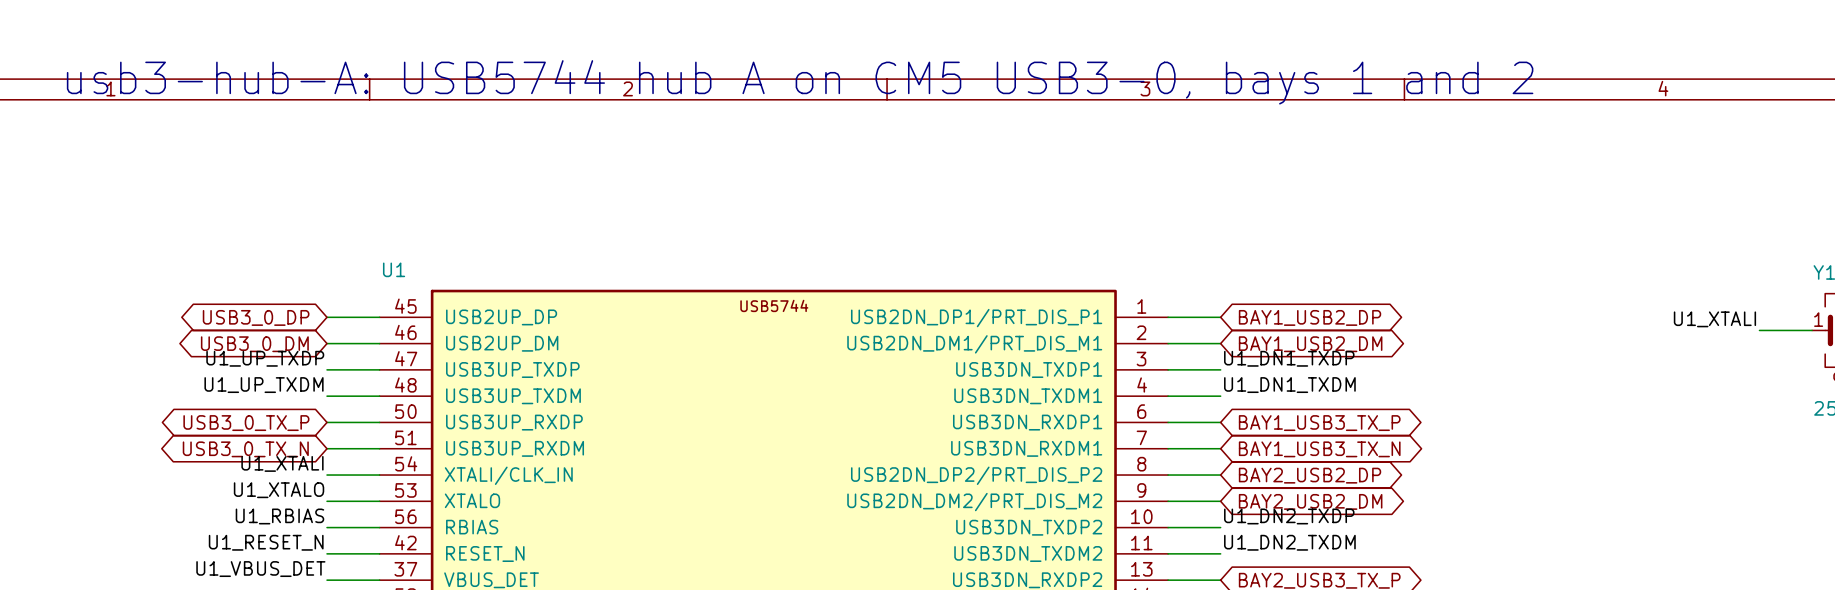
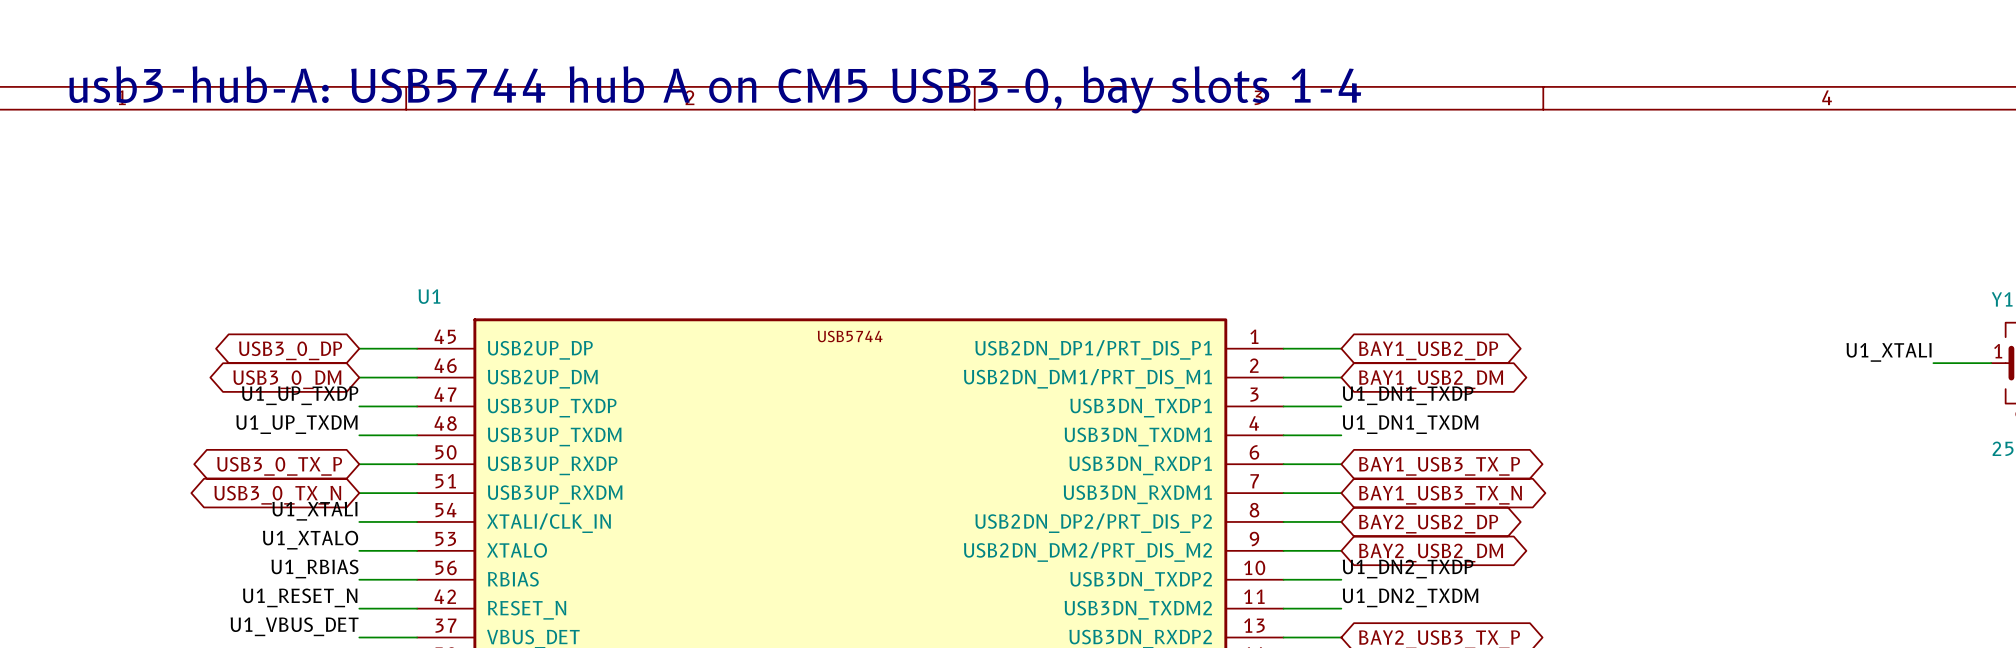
text: usb3-hub-A: USB5744 hub A on CM5 USB3-0, bays 1 and 2 (800, 82) -> usb3-hub-A: USB5744 hub A on CM5 USB3-0, bay slots 1-4 (715, 89)

